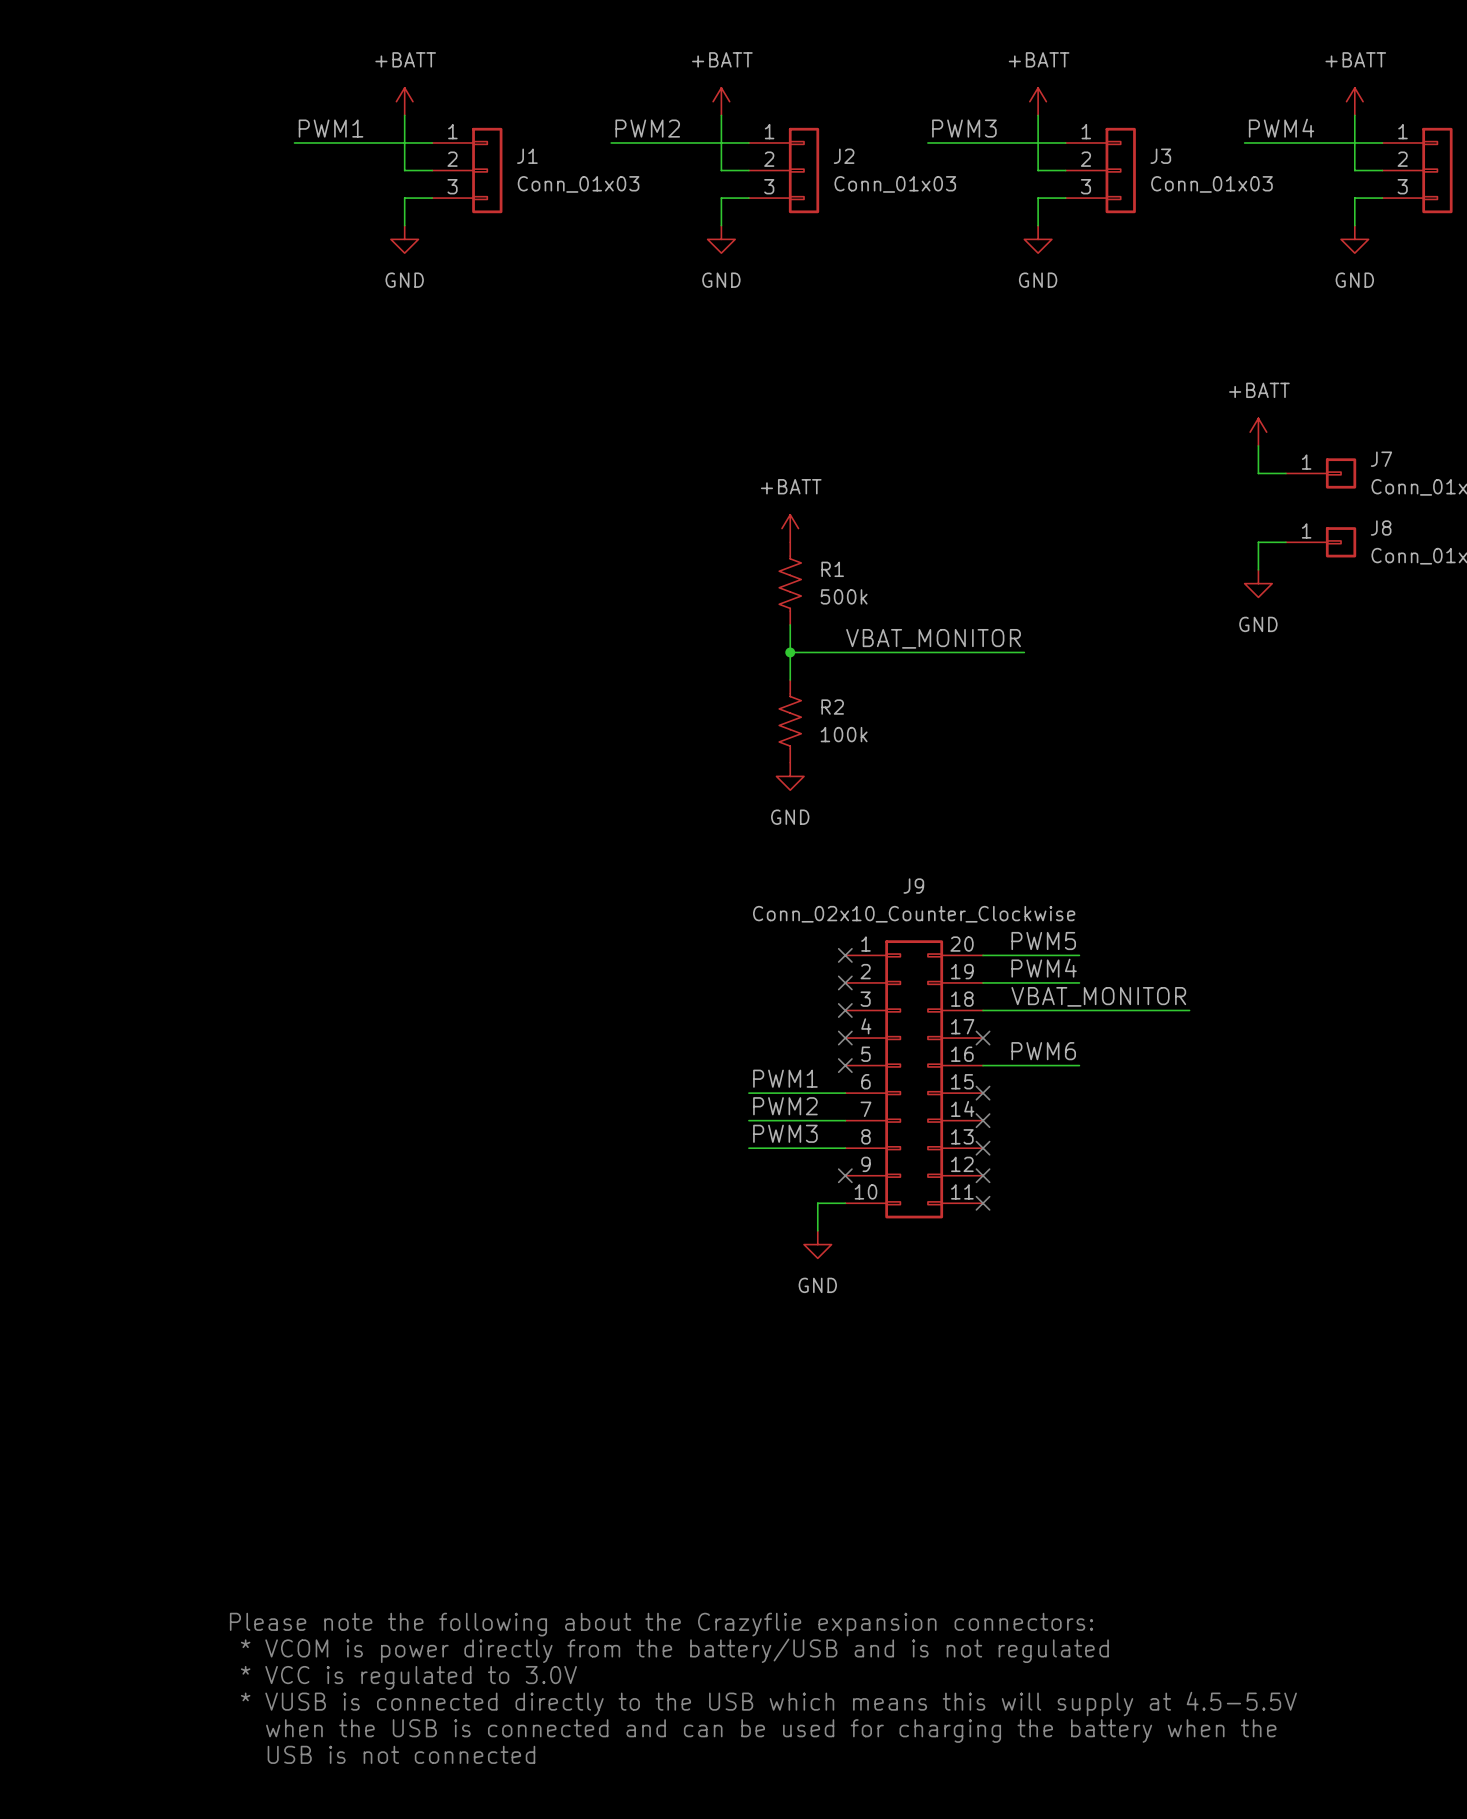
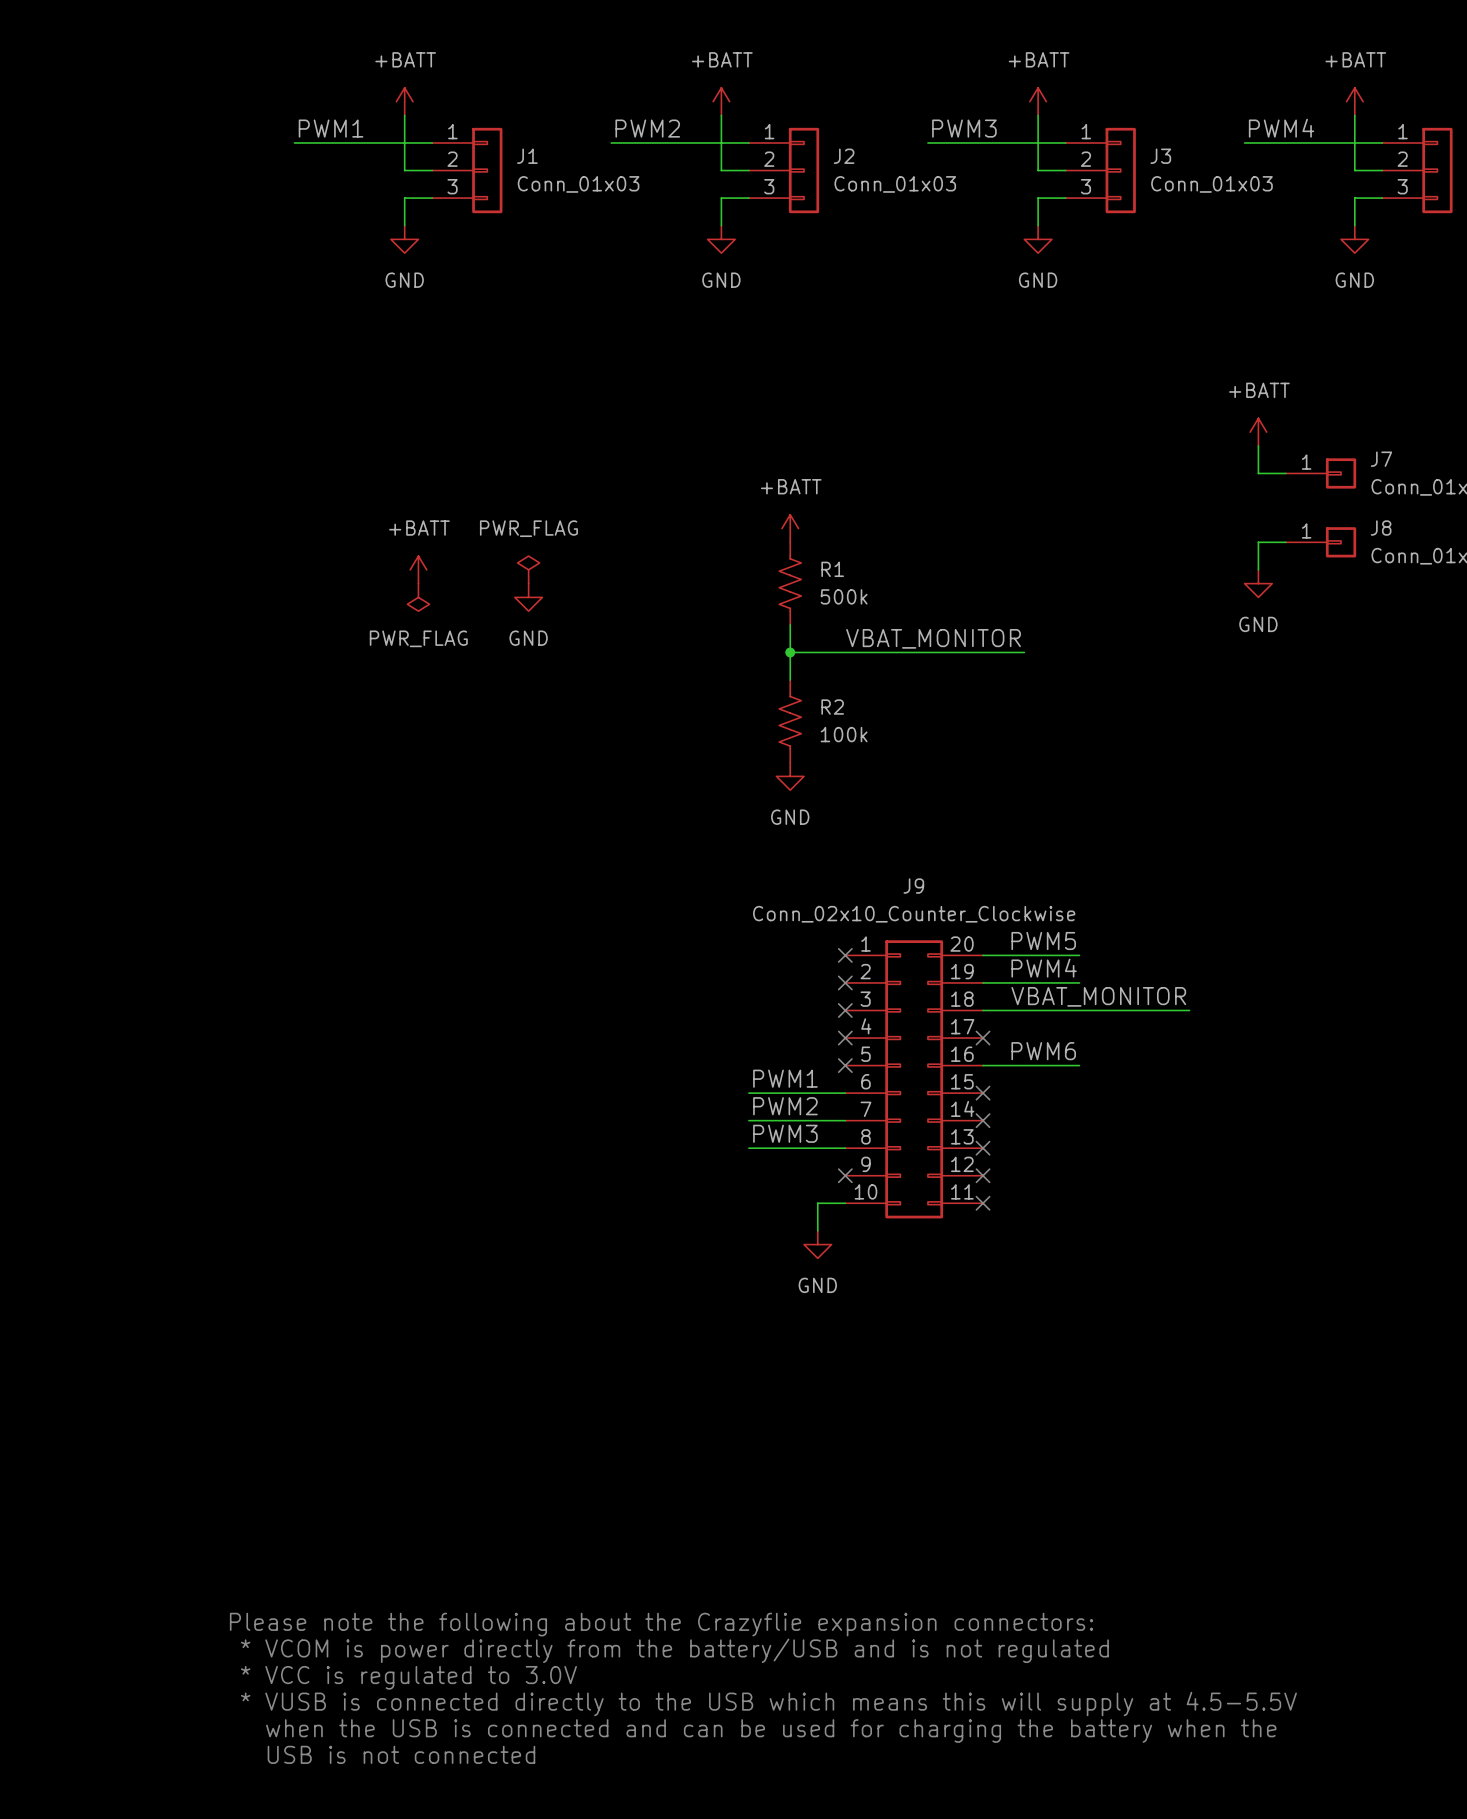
power symbol: none -> +BATT (418, 569)
power symbol: none -> PWR_FLAG (528, 569)
power symbol: none -> PWR_FLAG (418, 597)
power symbol: none -> GND (528, 597)

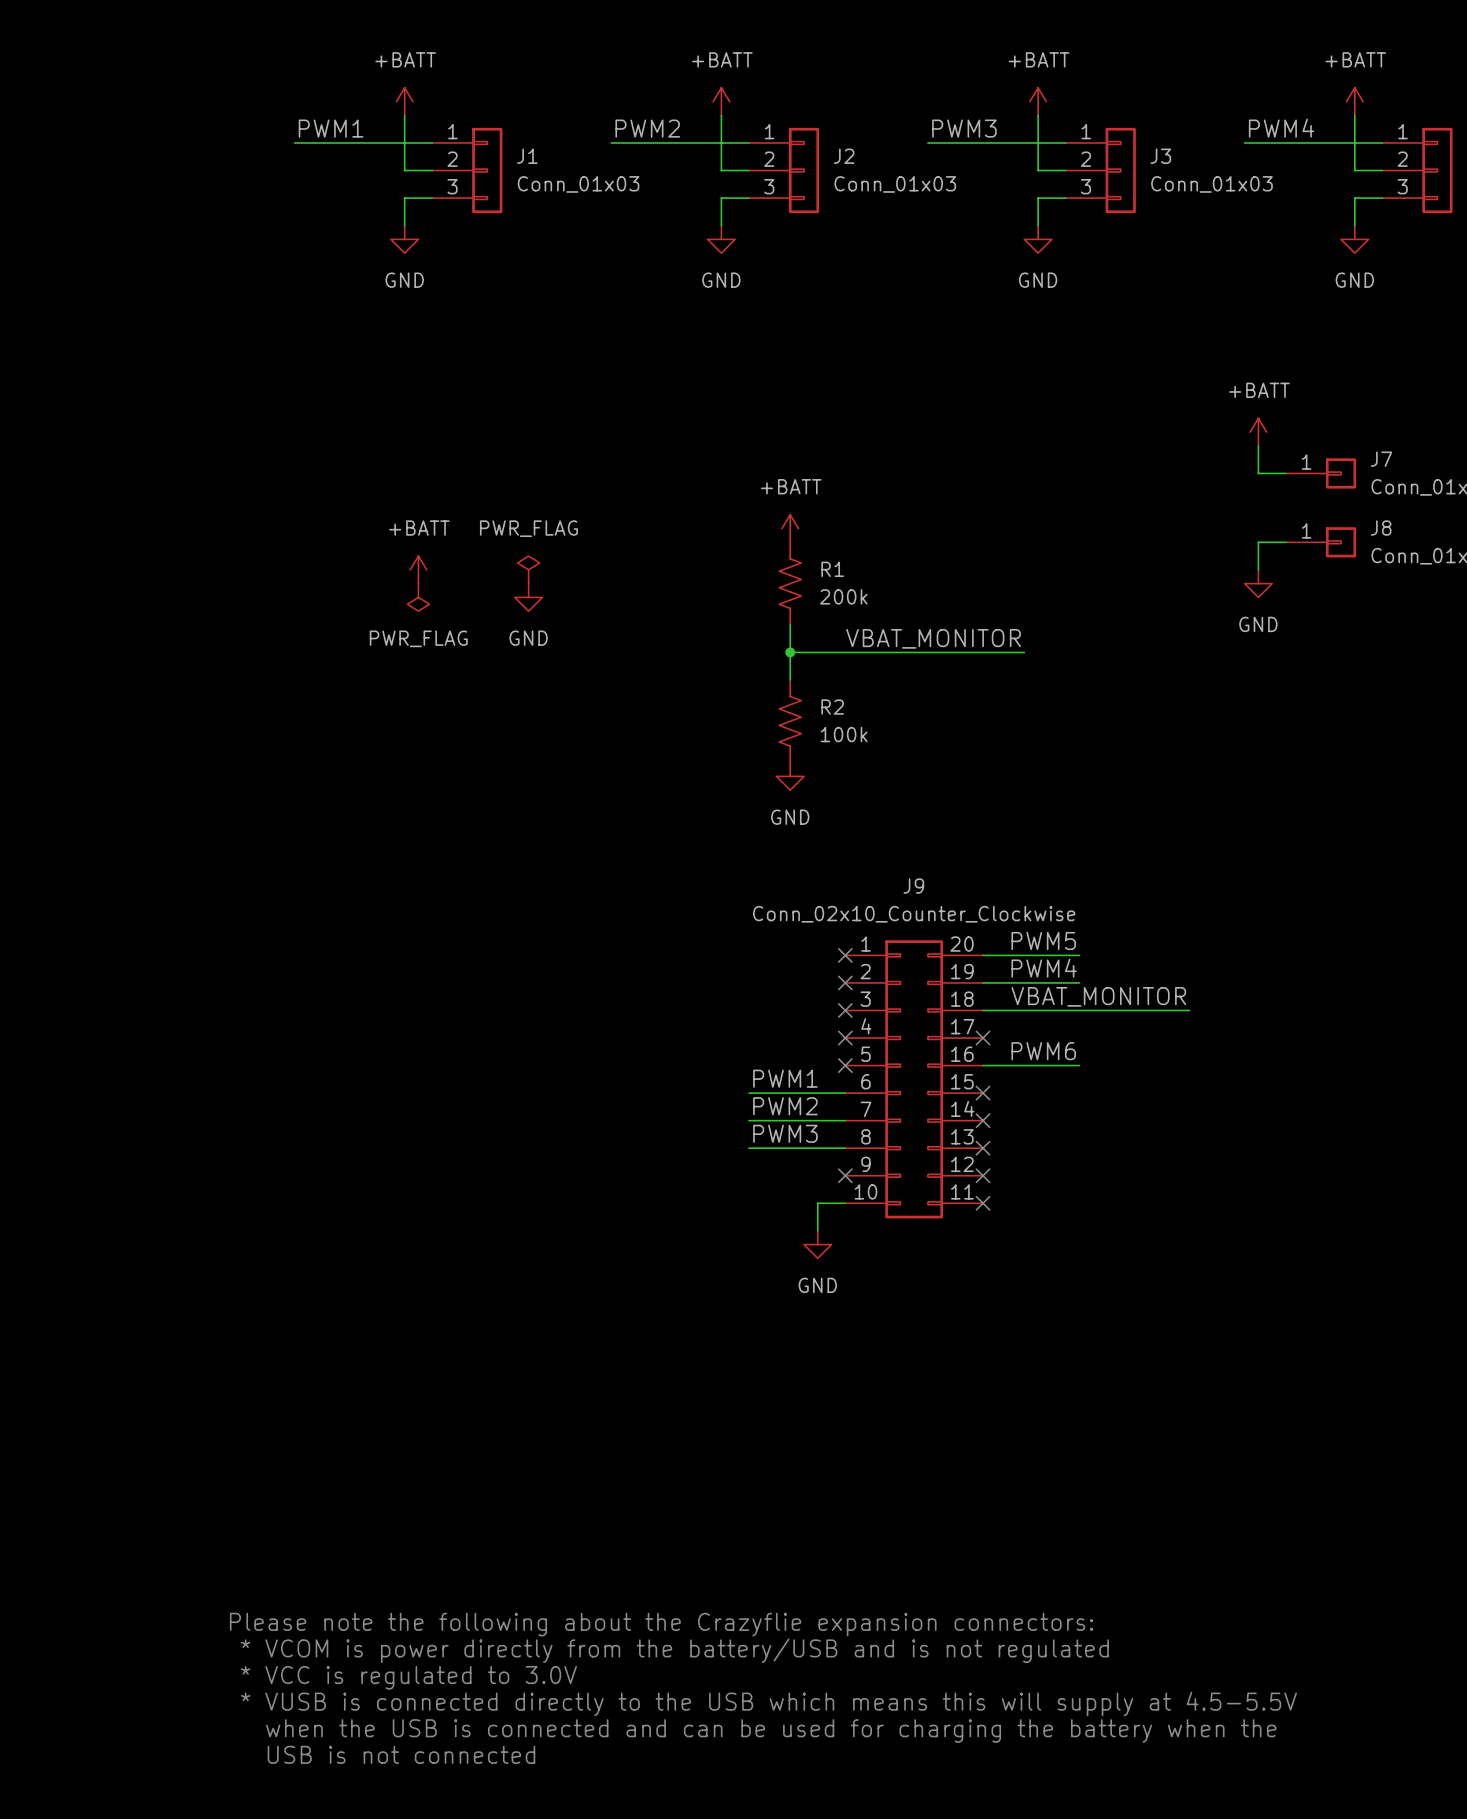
R1 value: 500k (844, 596) -> 200k (843, 596)

